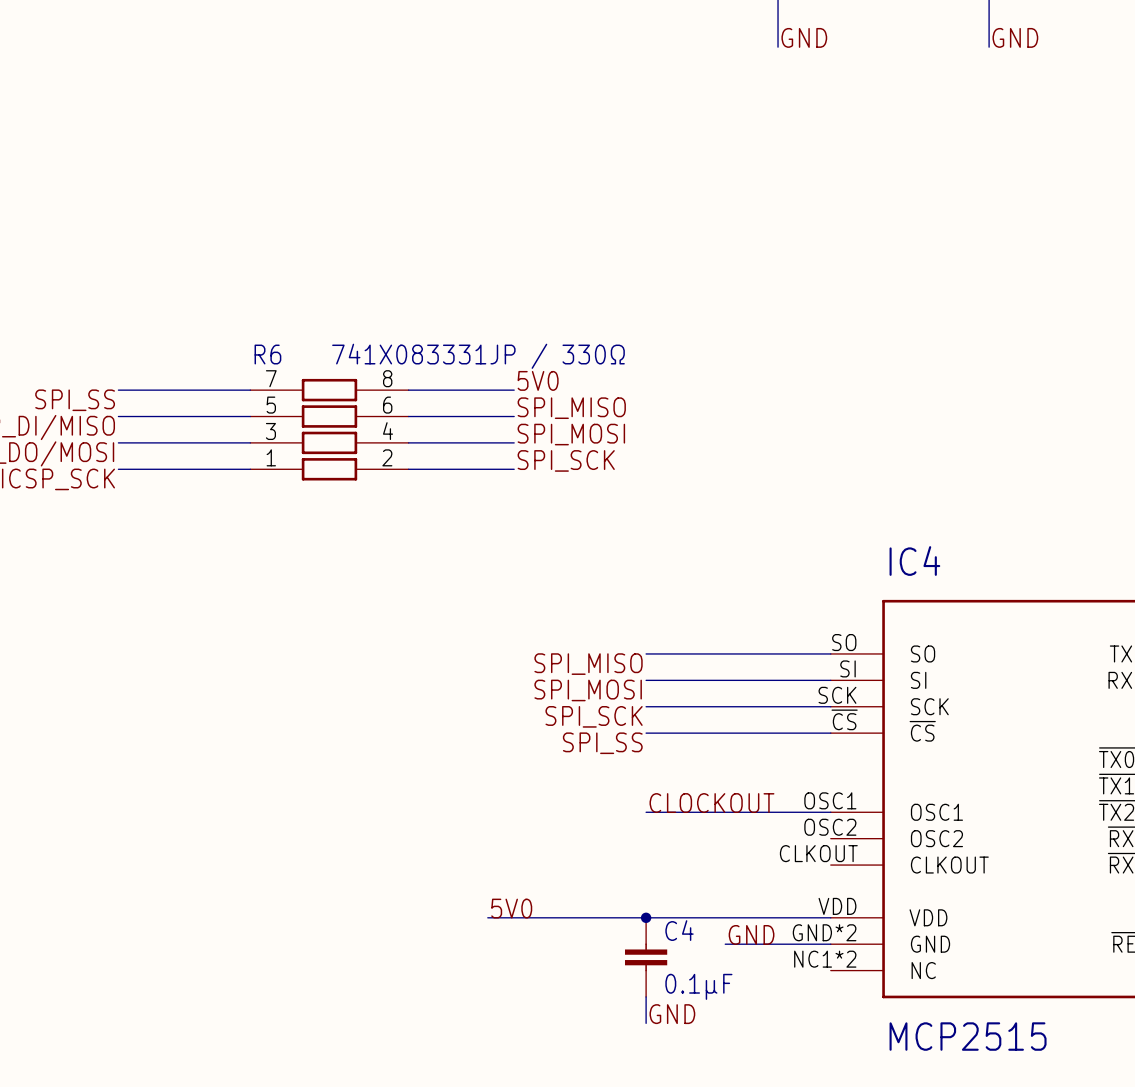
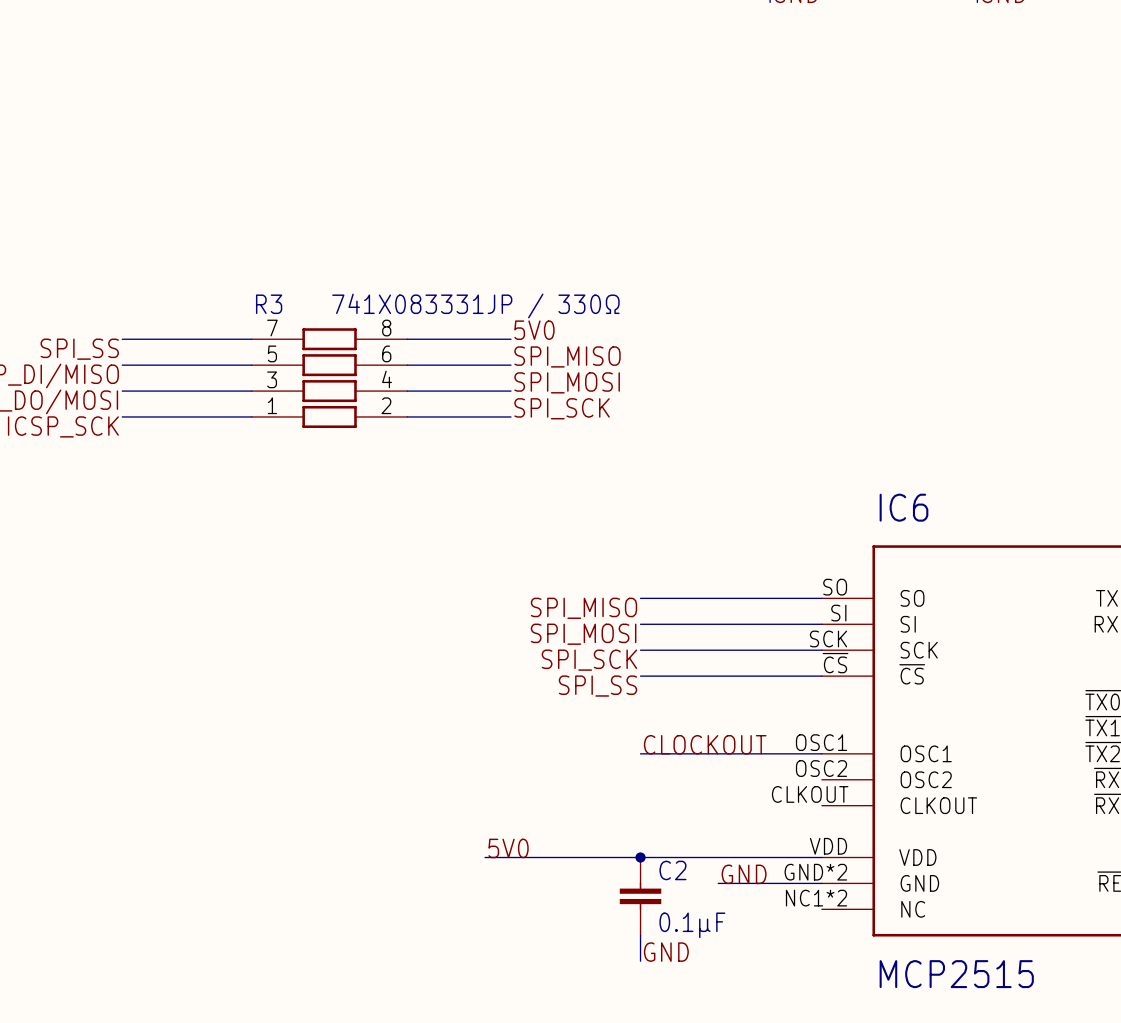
R6 name: R6 (267, 354) -> R3 (269, 304)
IC4 name: IC4 (914, 561) -> IC6 (903, 507)
C4 name: C4 (679, 930) -> C2 (672, 870)

